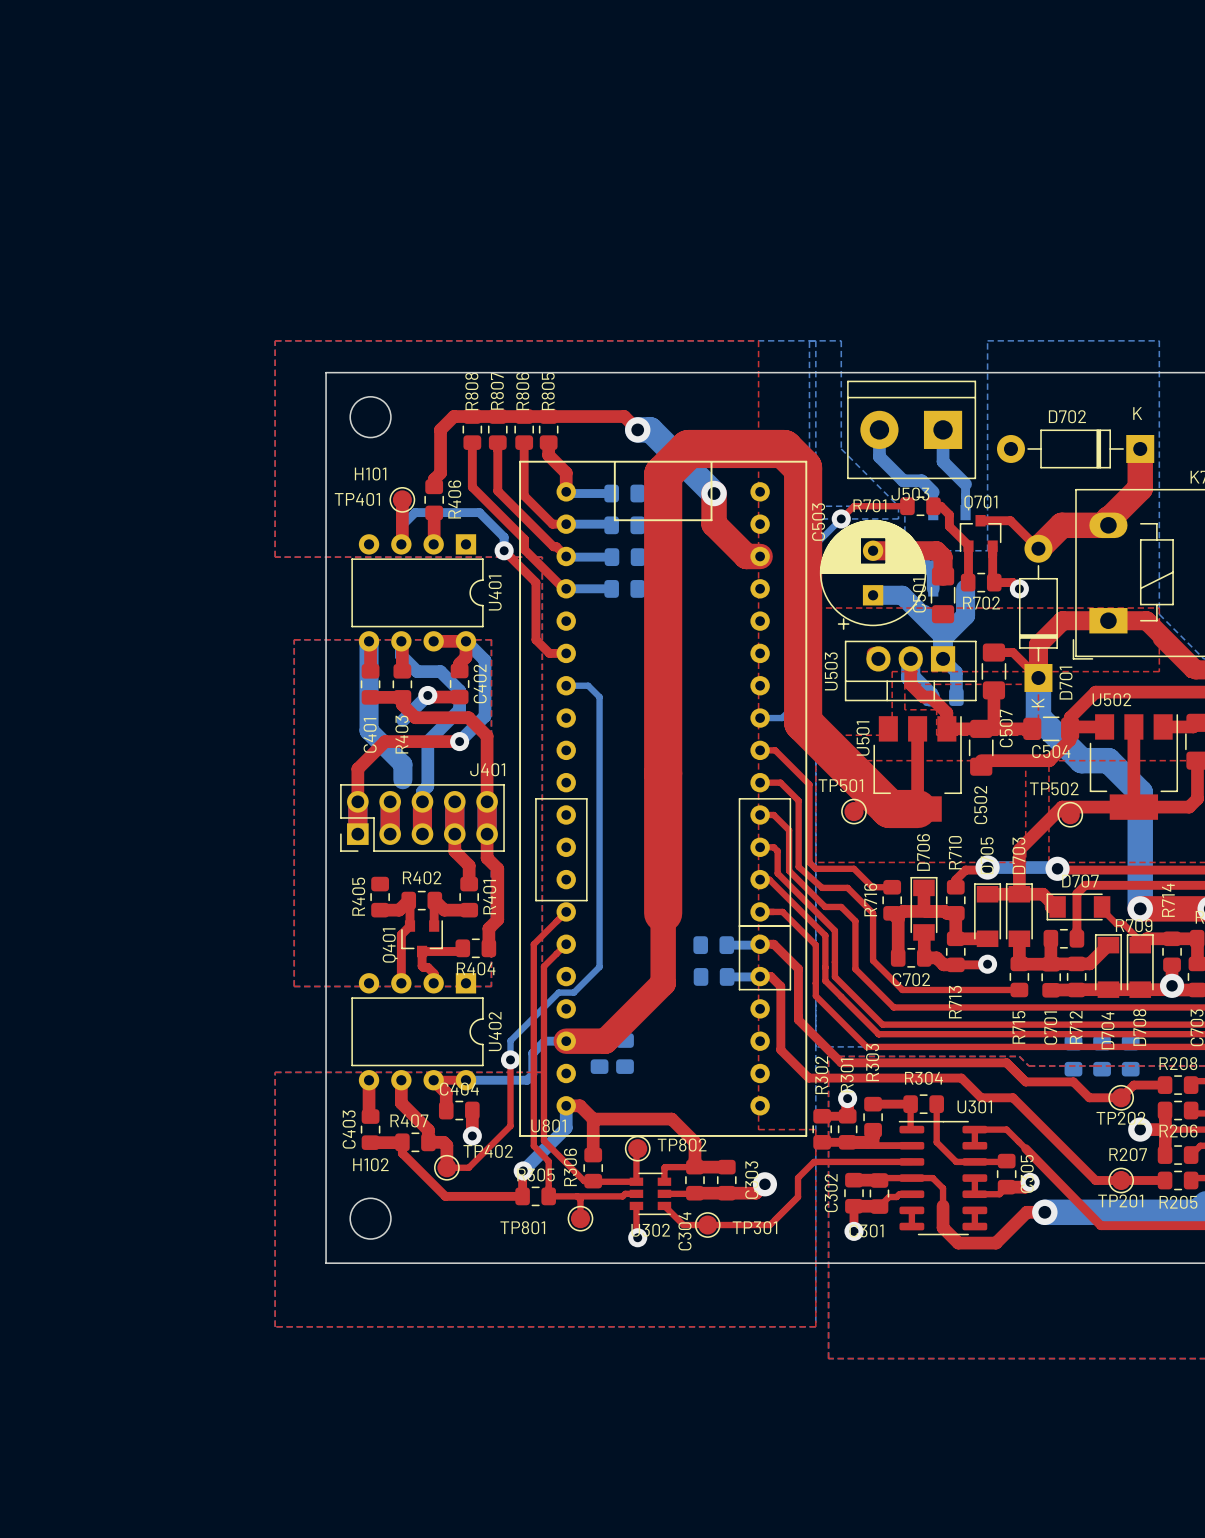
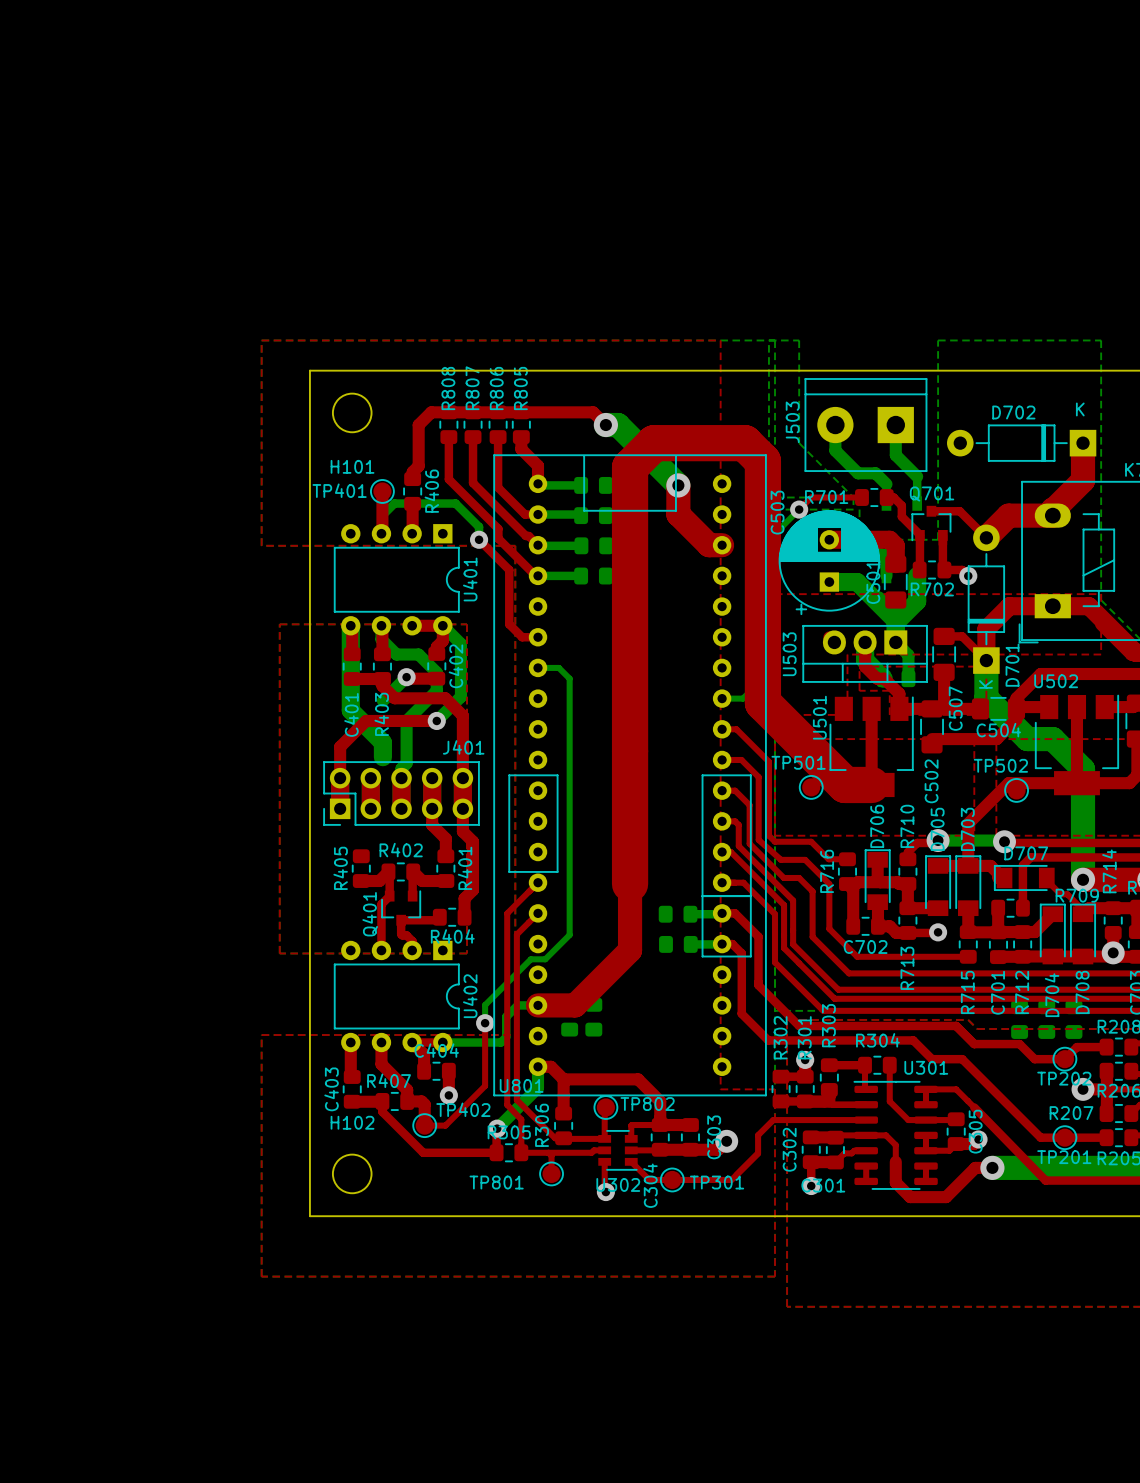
J503 name rotation: 0° (910, 494) -> 90° counterclockwise (792, 422)
J503 name position: J503 (910, 494) -> J503 (792, 422)

